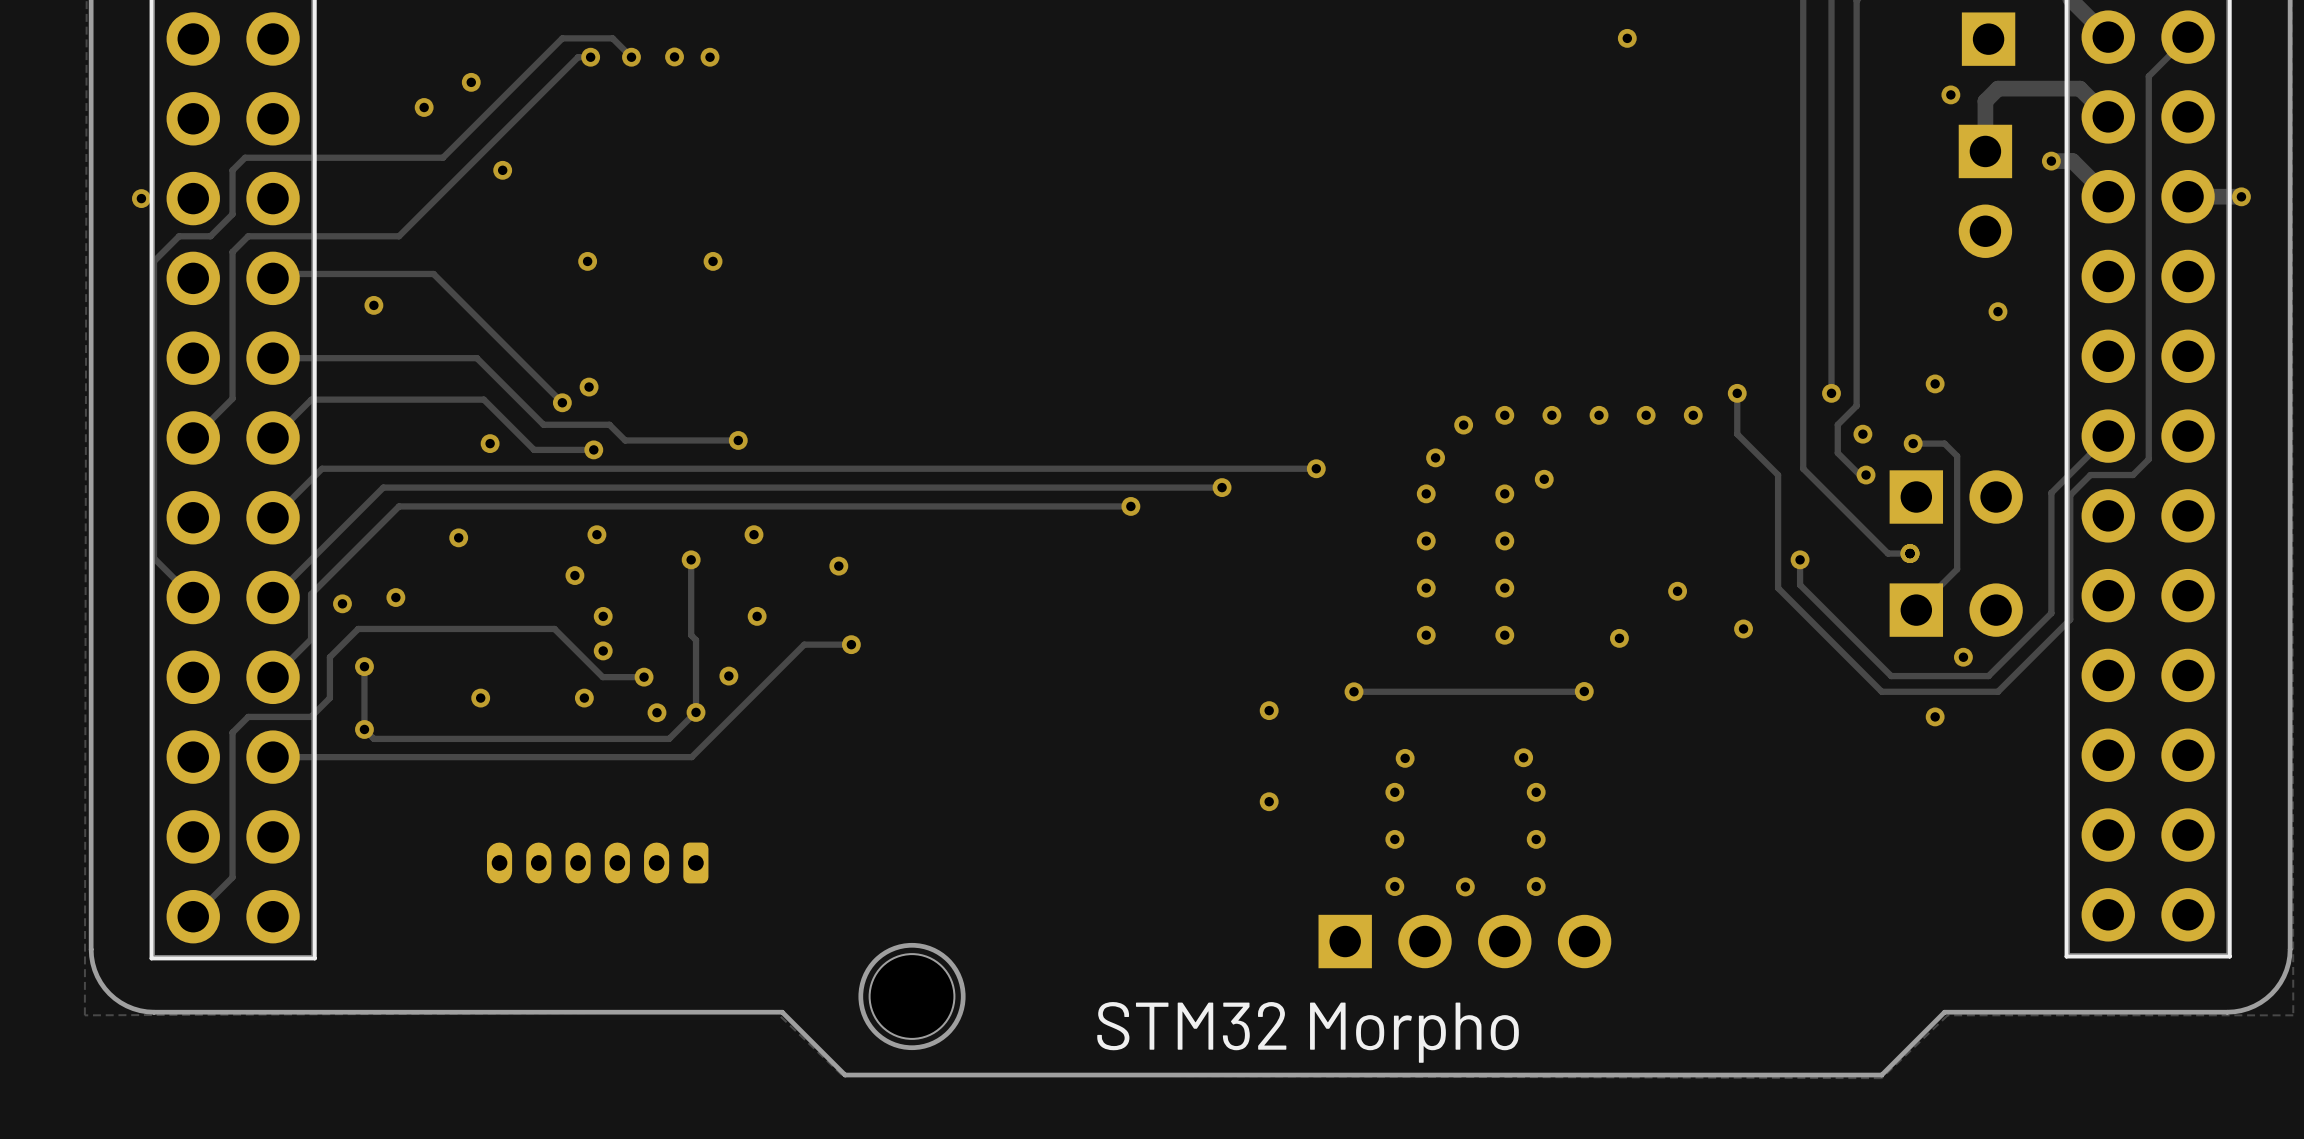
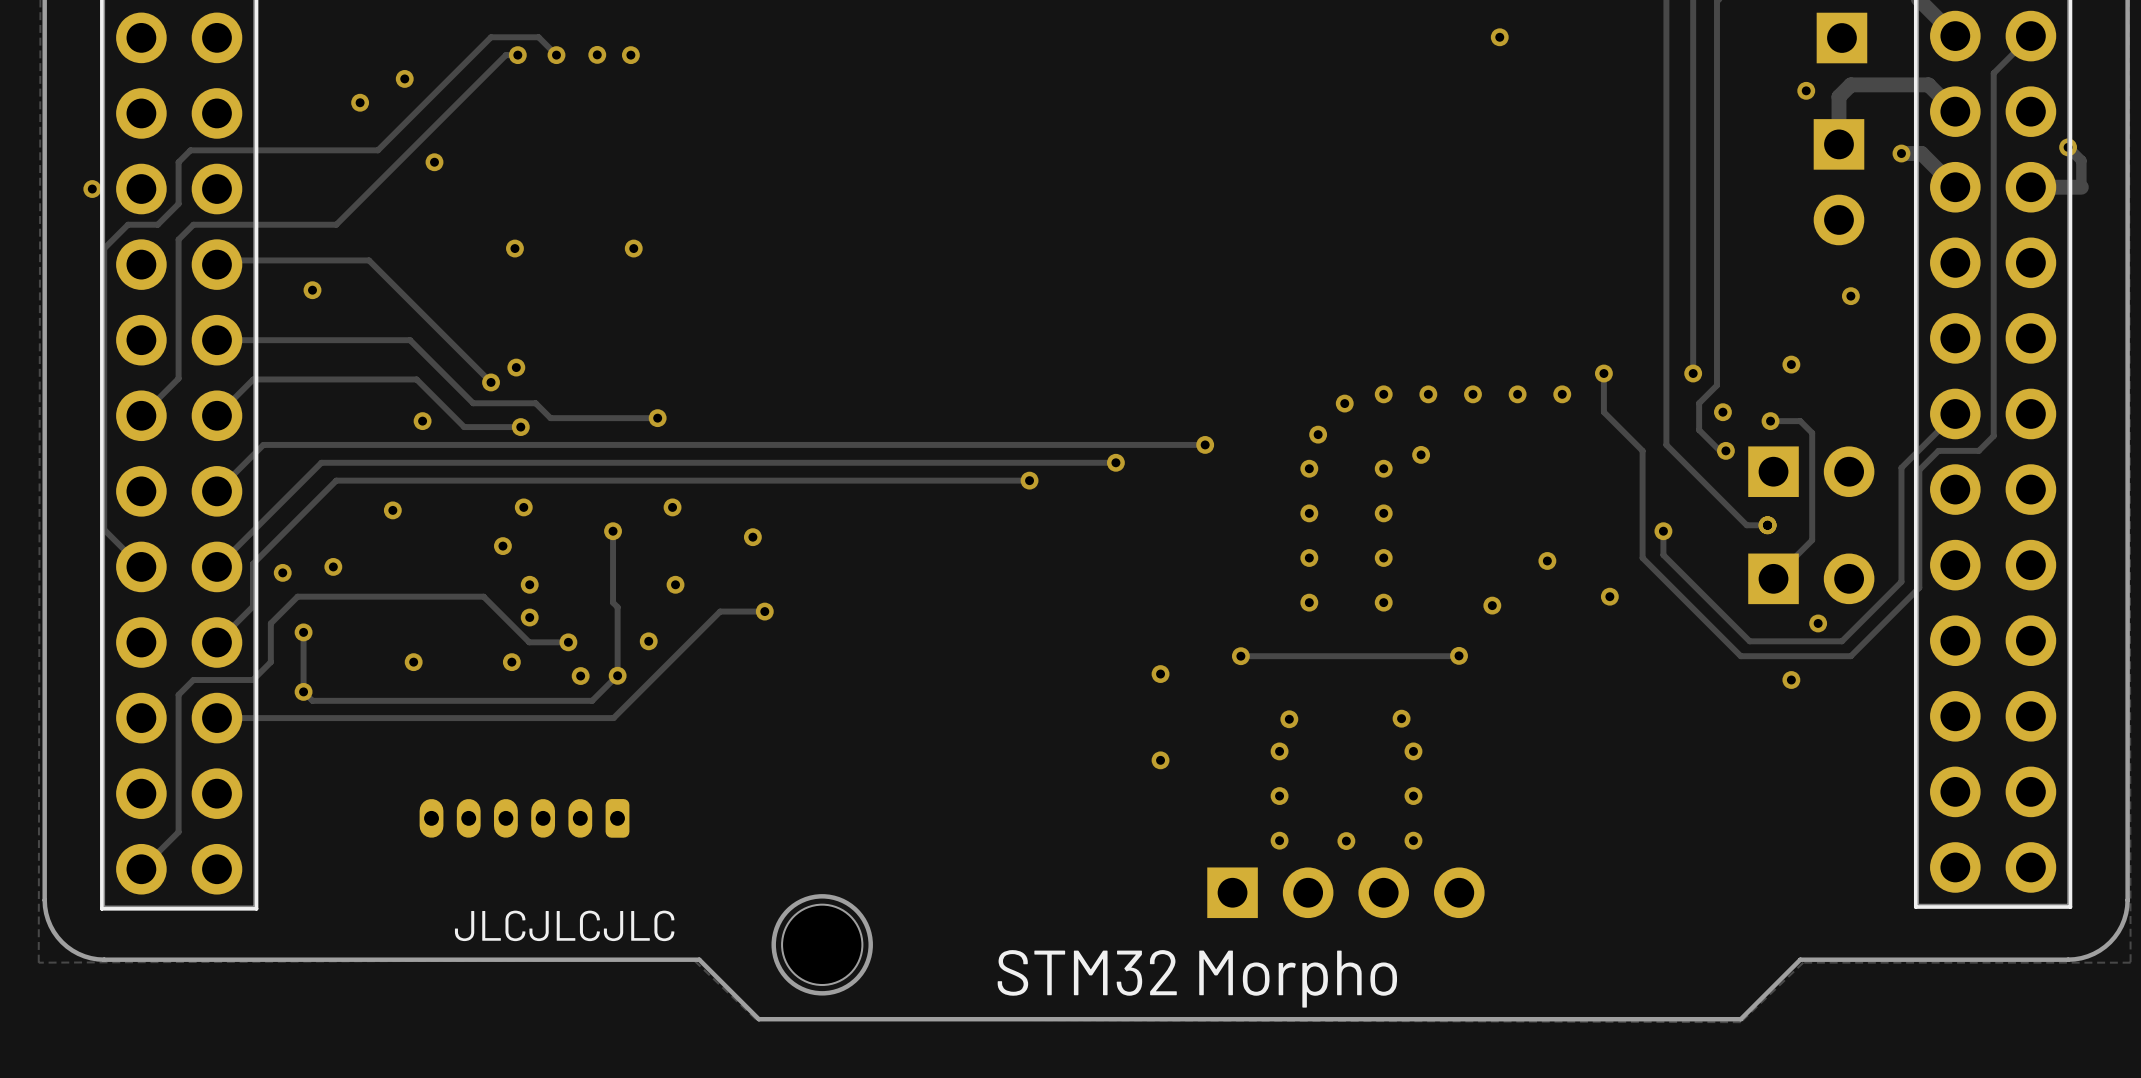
track: none -> (2068, 147) (2081, 160) (2081, 187)
via position: (2241, 196) -> (2068, 147)
text: none -> JLCJLCJLC (564, 925)

